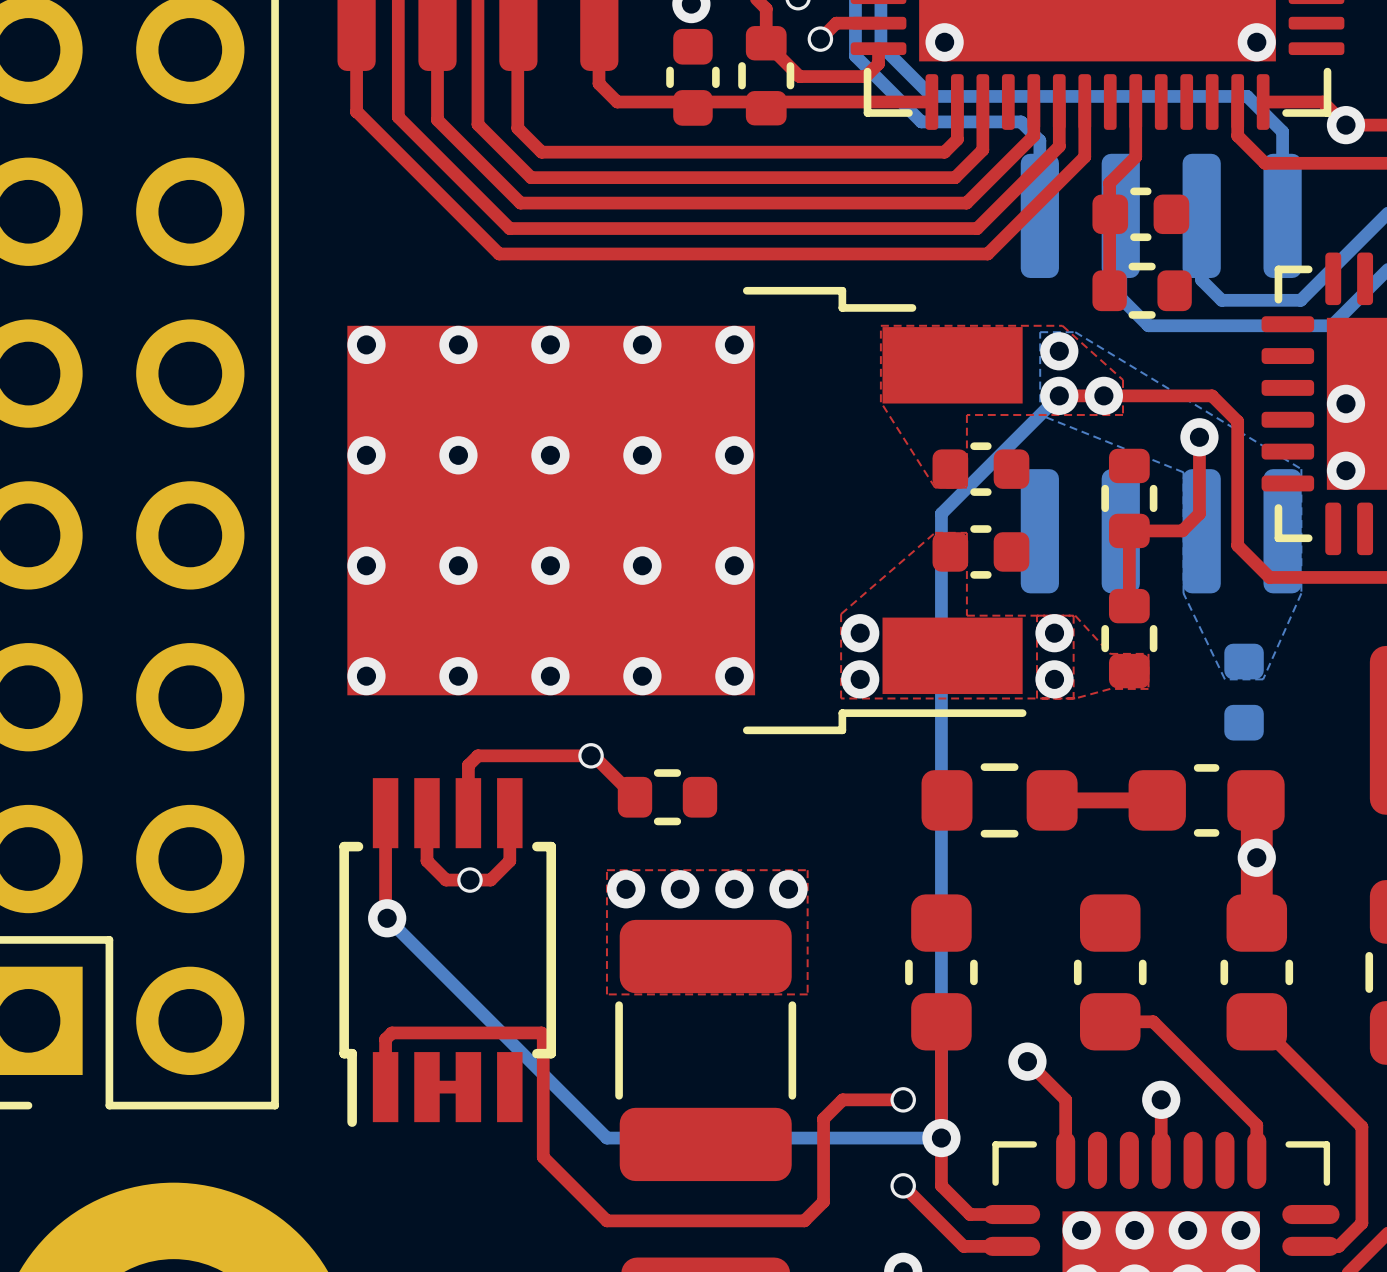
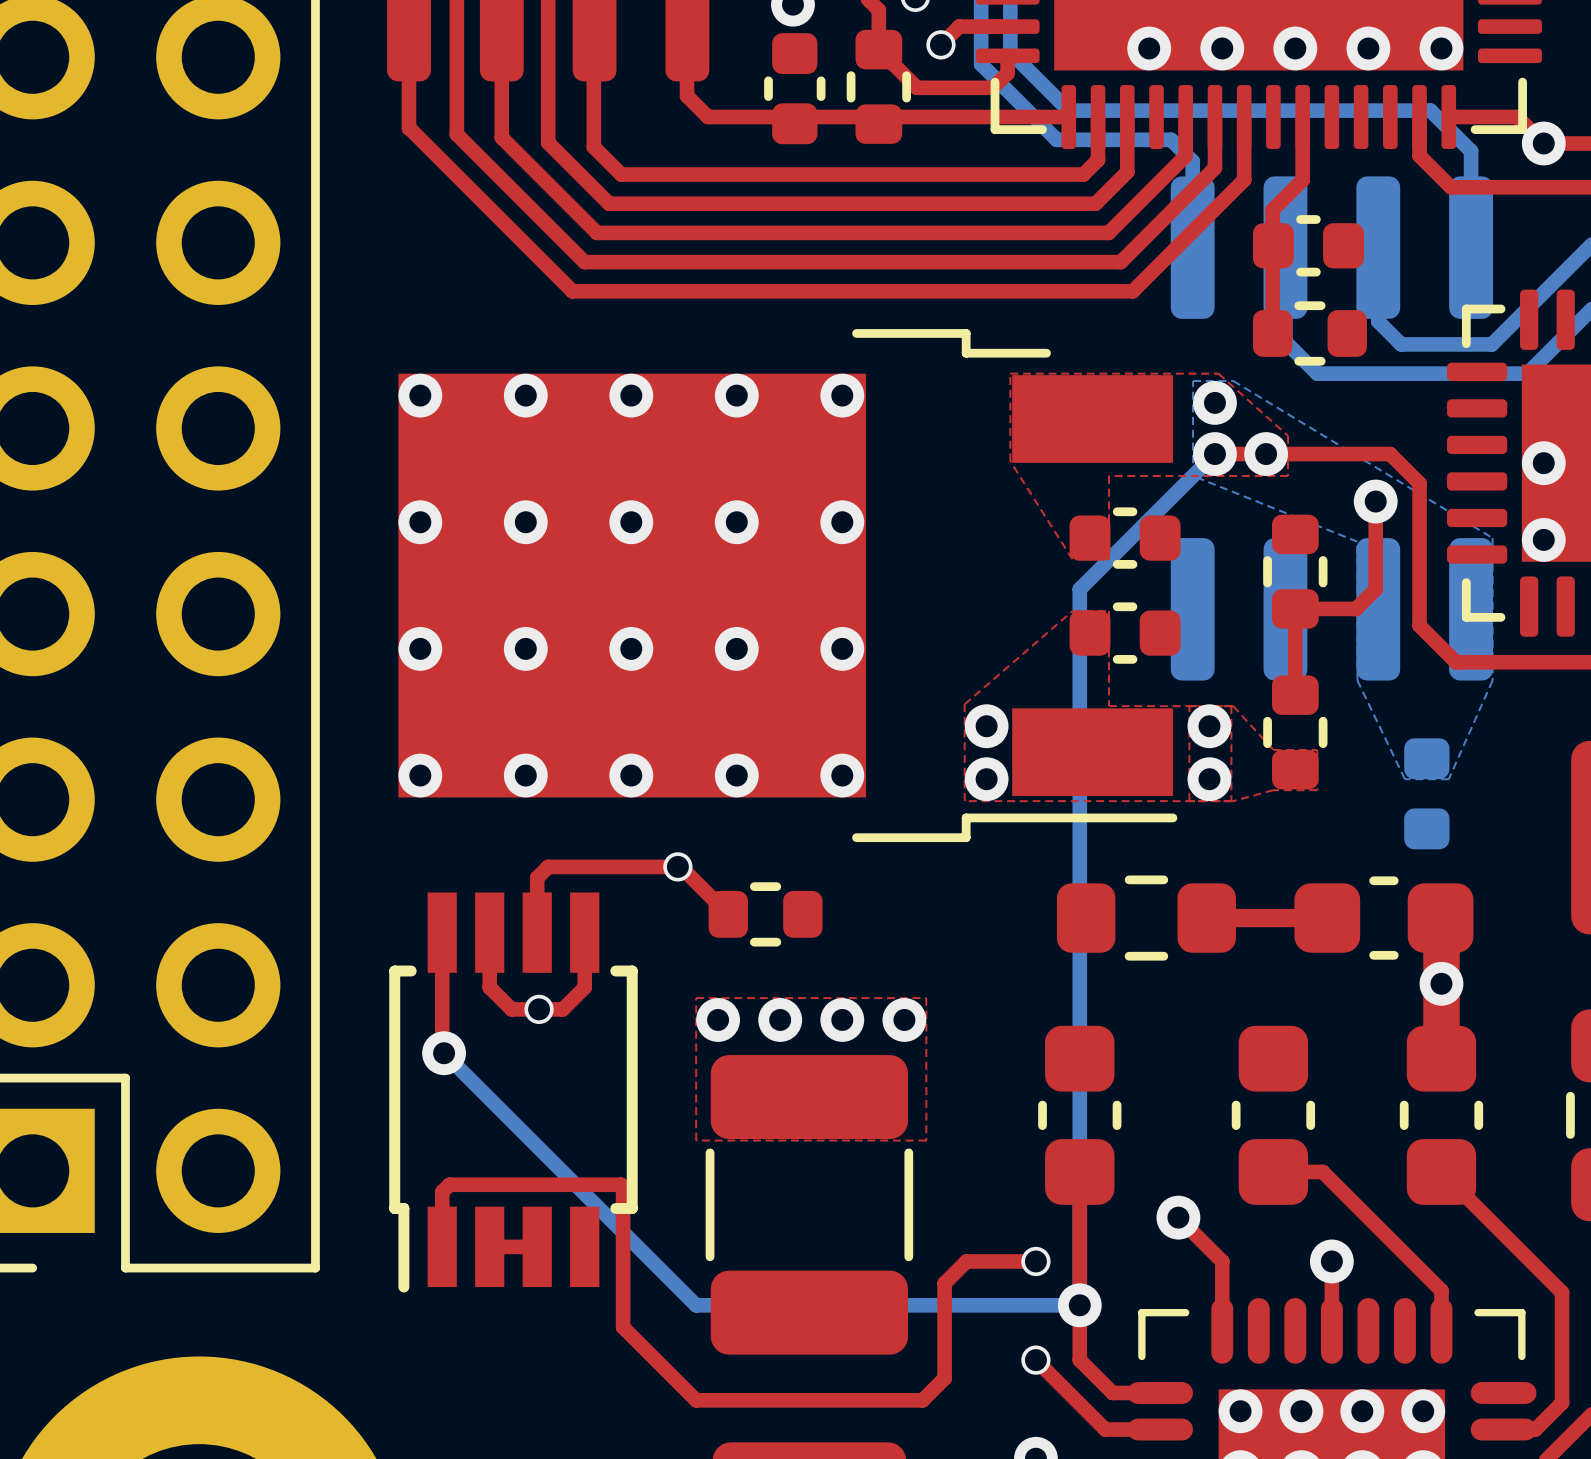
via: (944, 42) -> none
via: none -> (1149, 48)
via: none -> (1222, 48)
via: none -> (1295, 48)
via: none -> (1368, 48)

